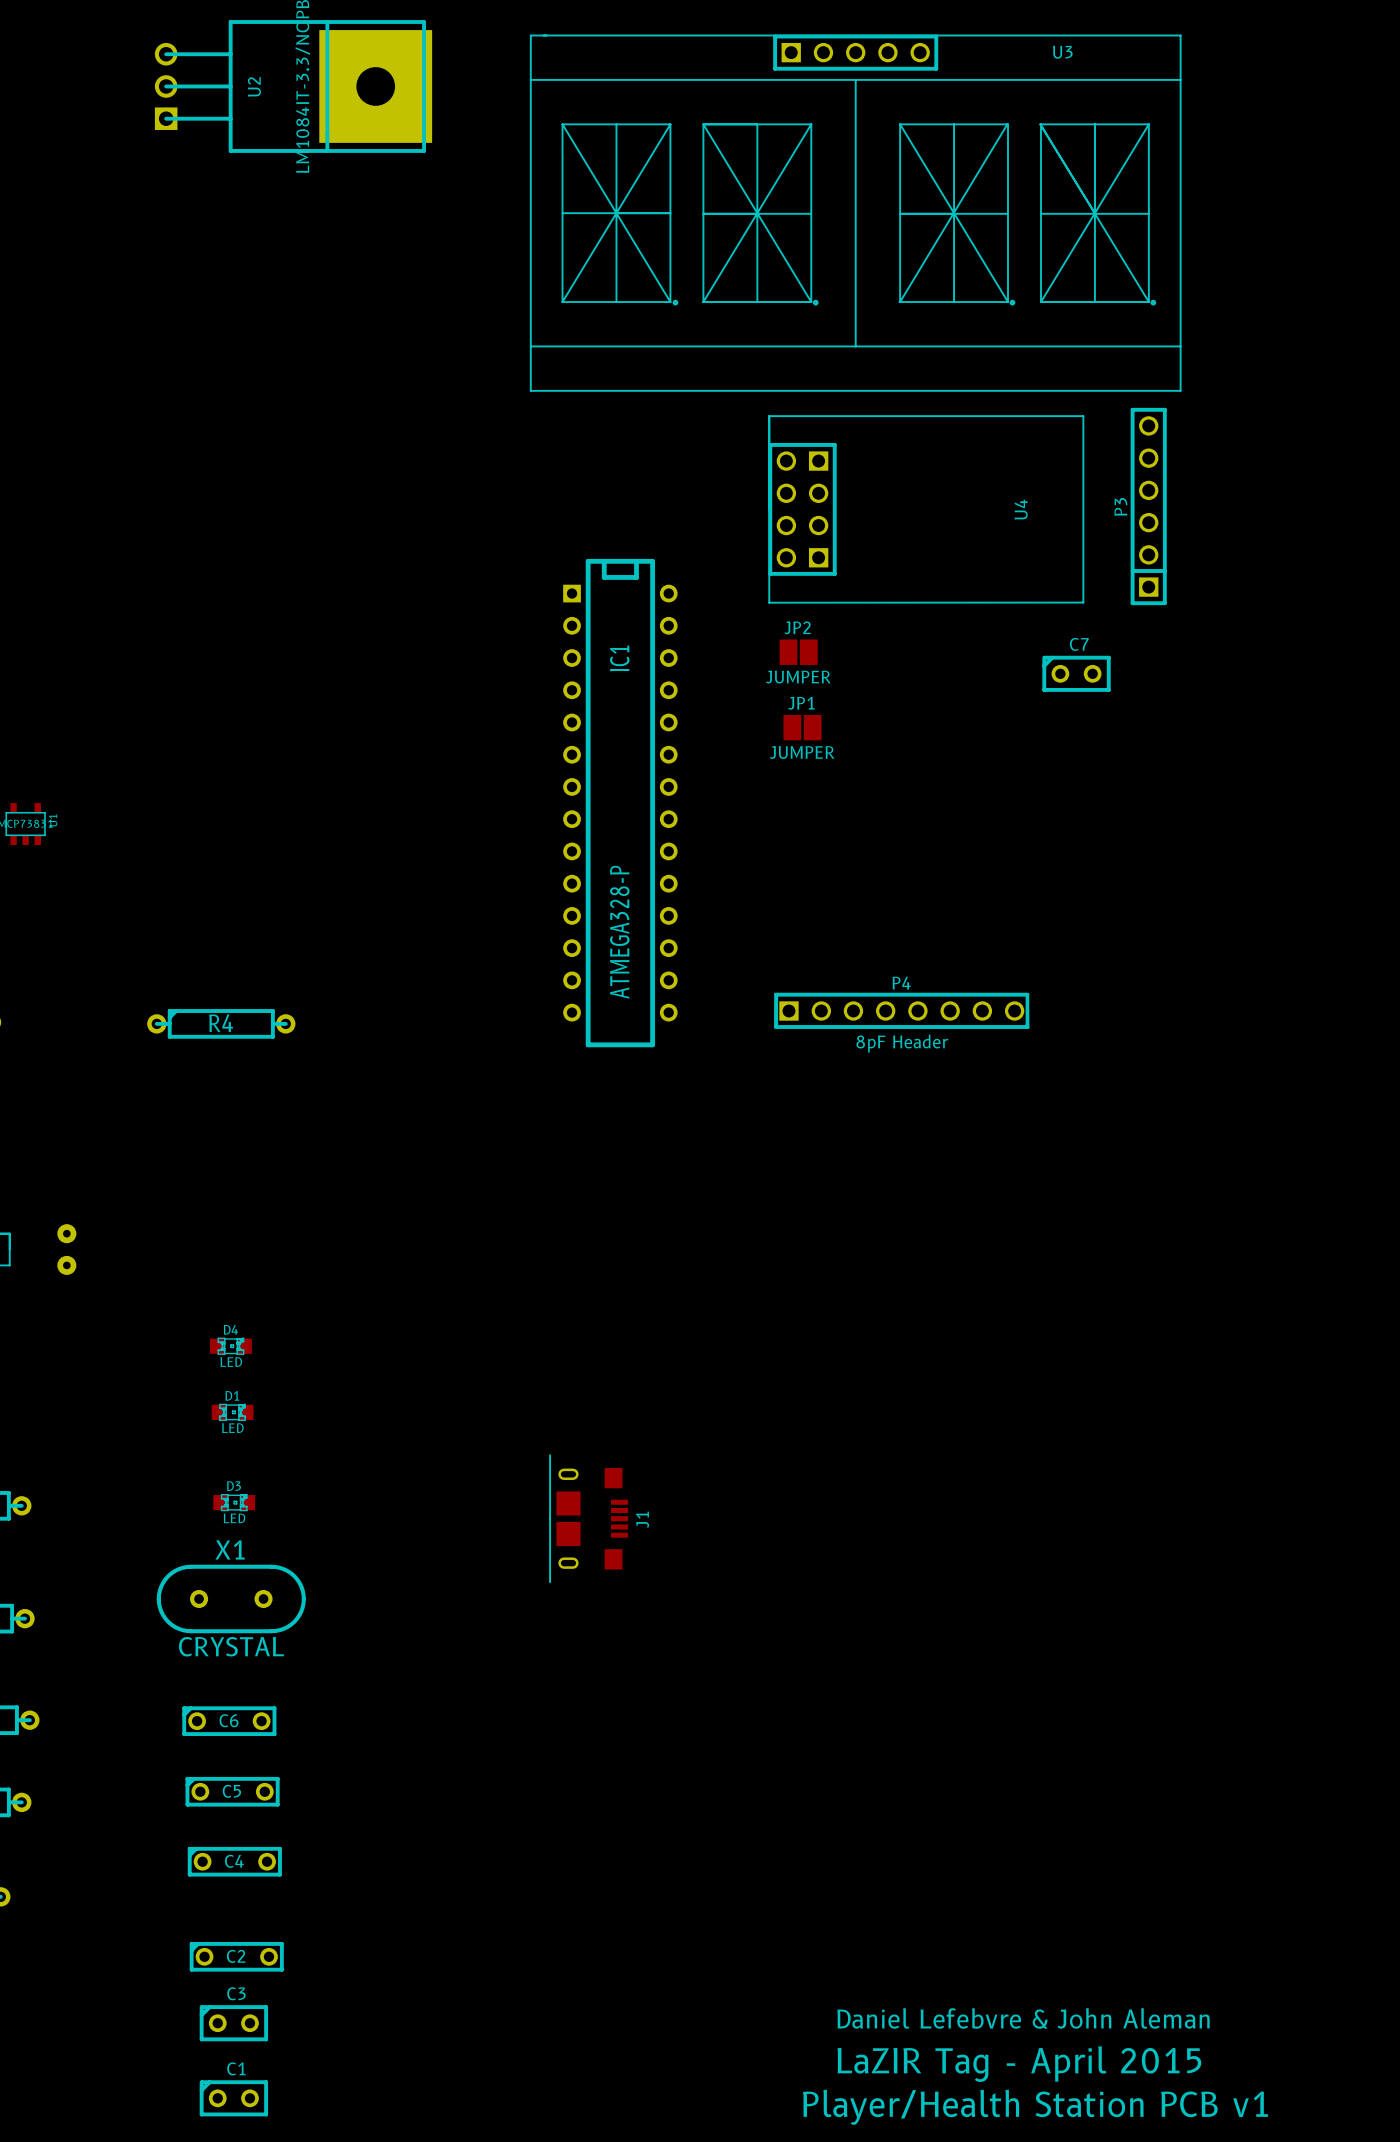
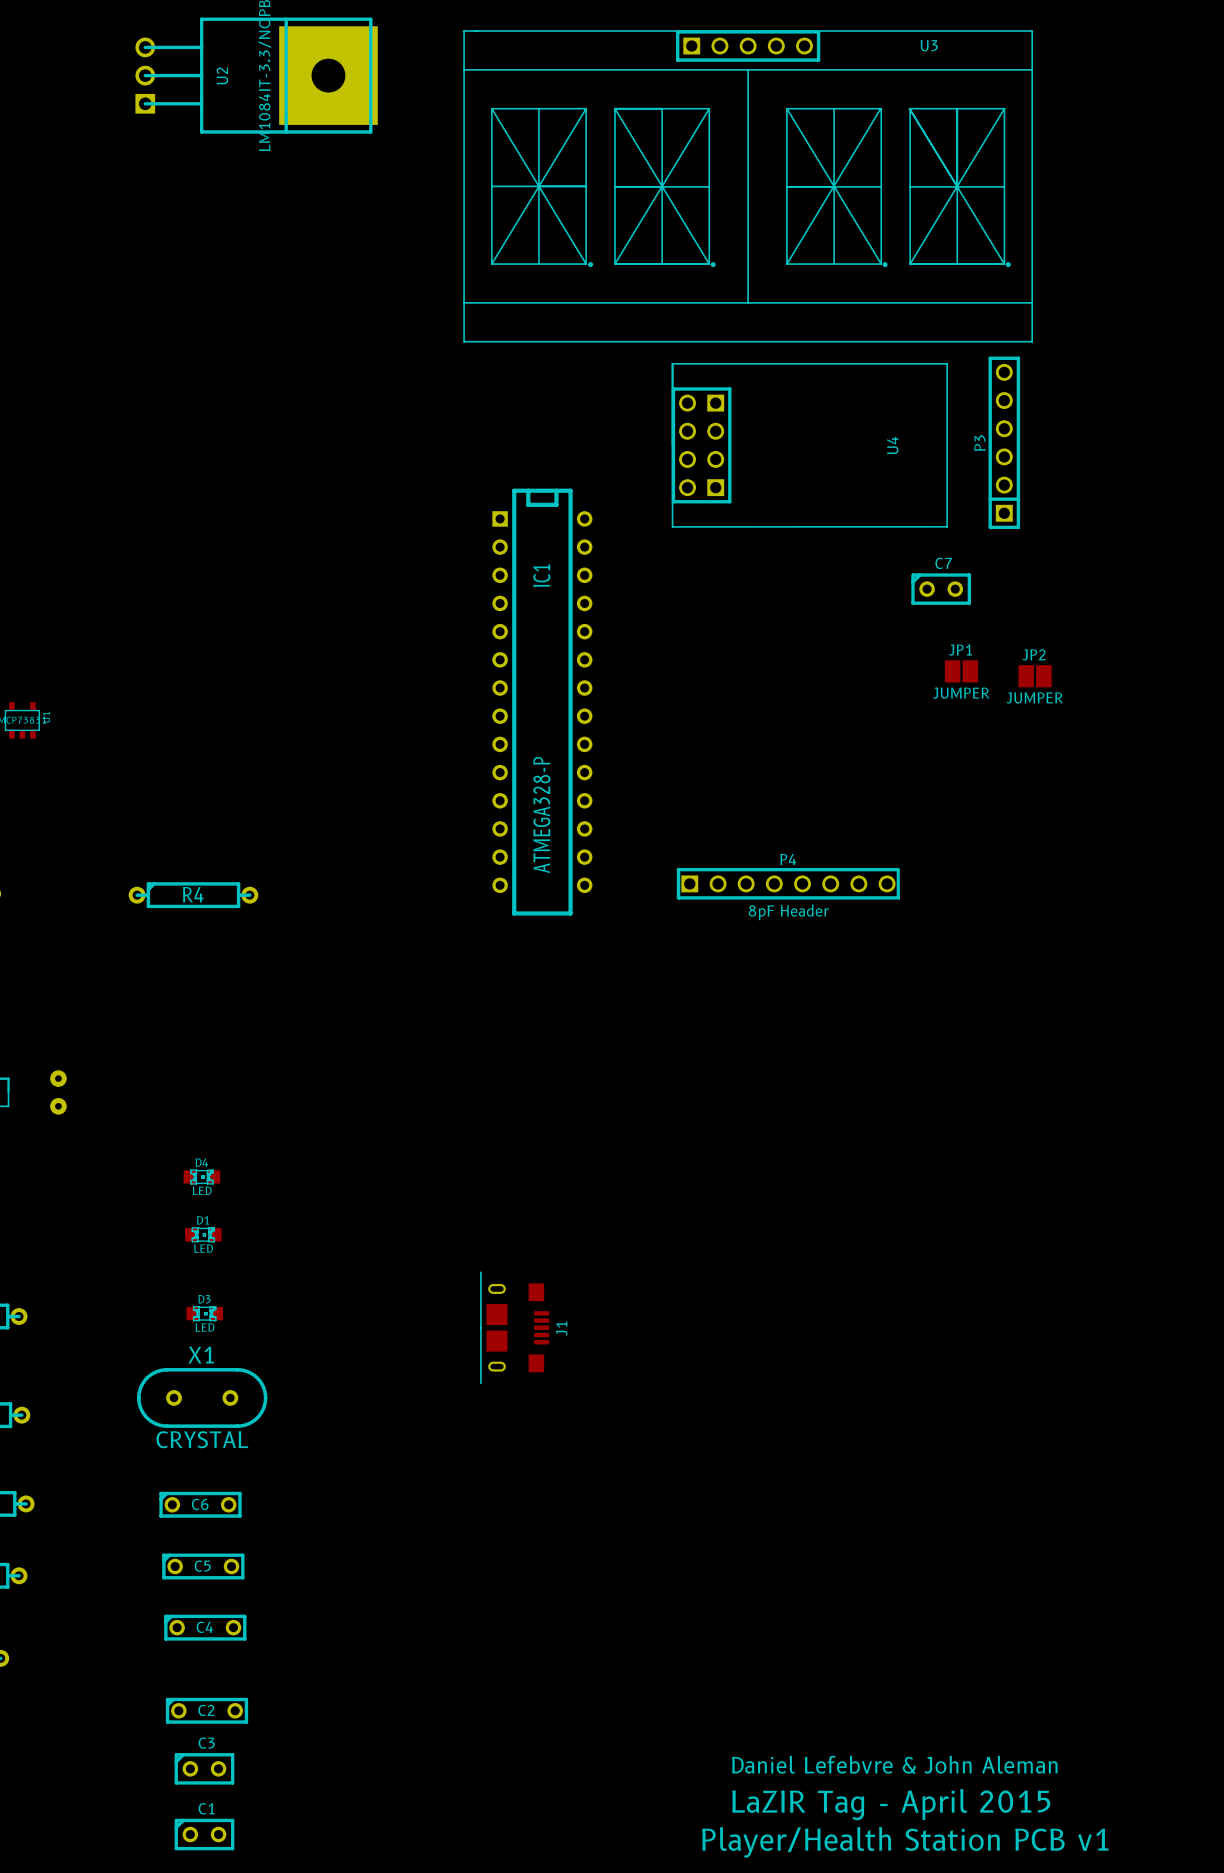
JP2 position: (798, 652) -> (1035, 676)
JP1 position: (802, 727) -> (961, 671)

